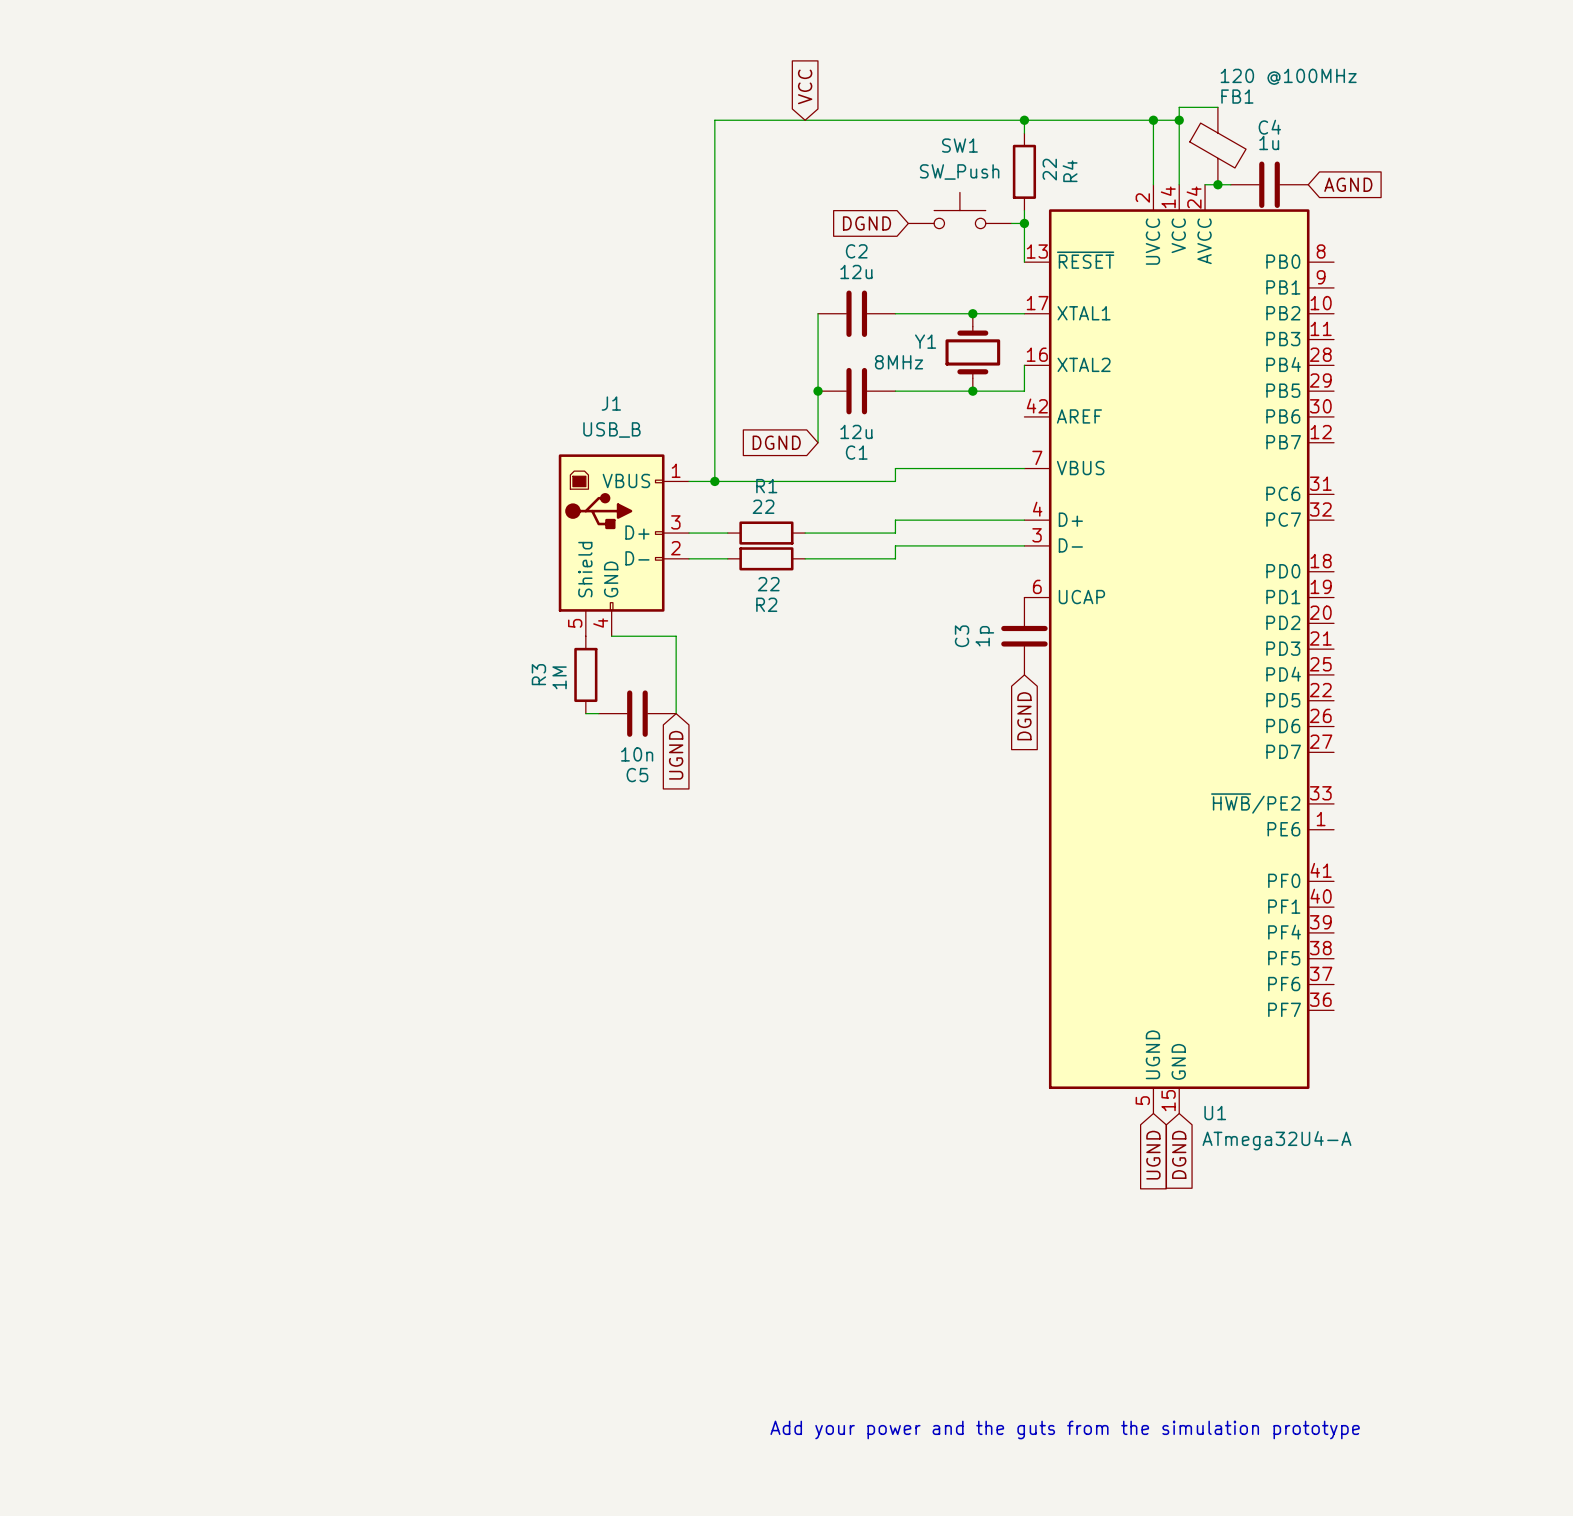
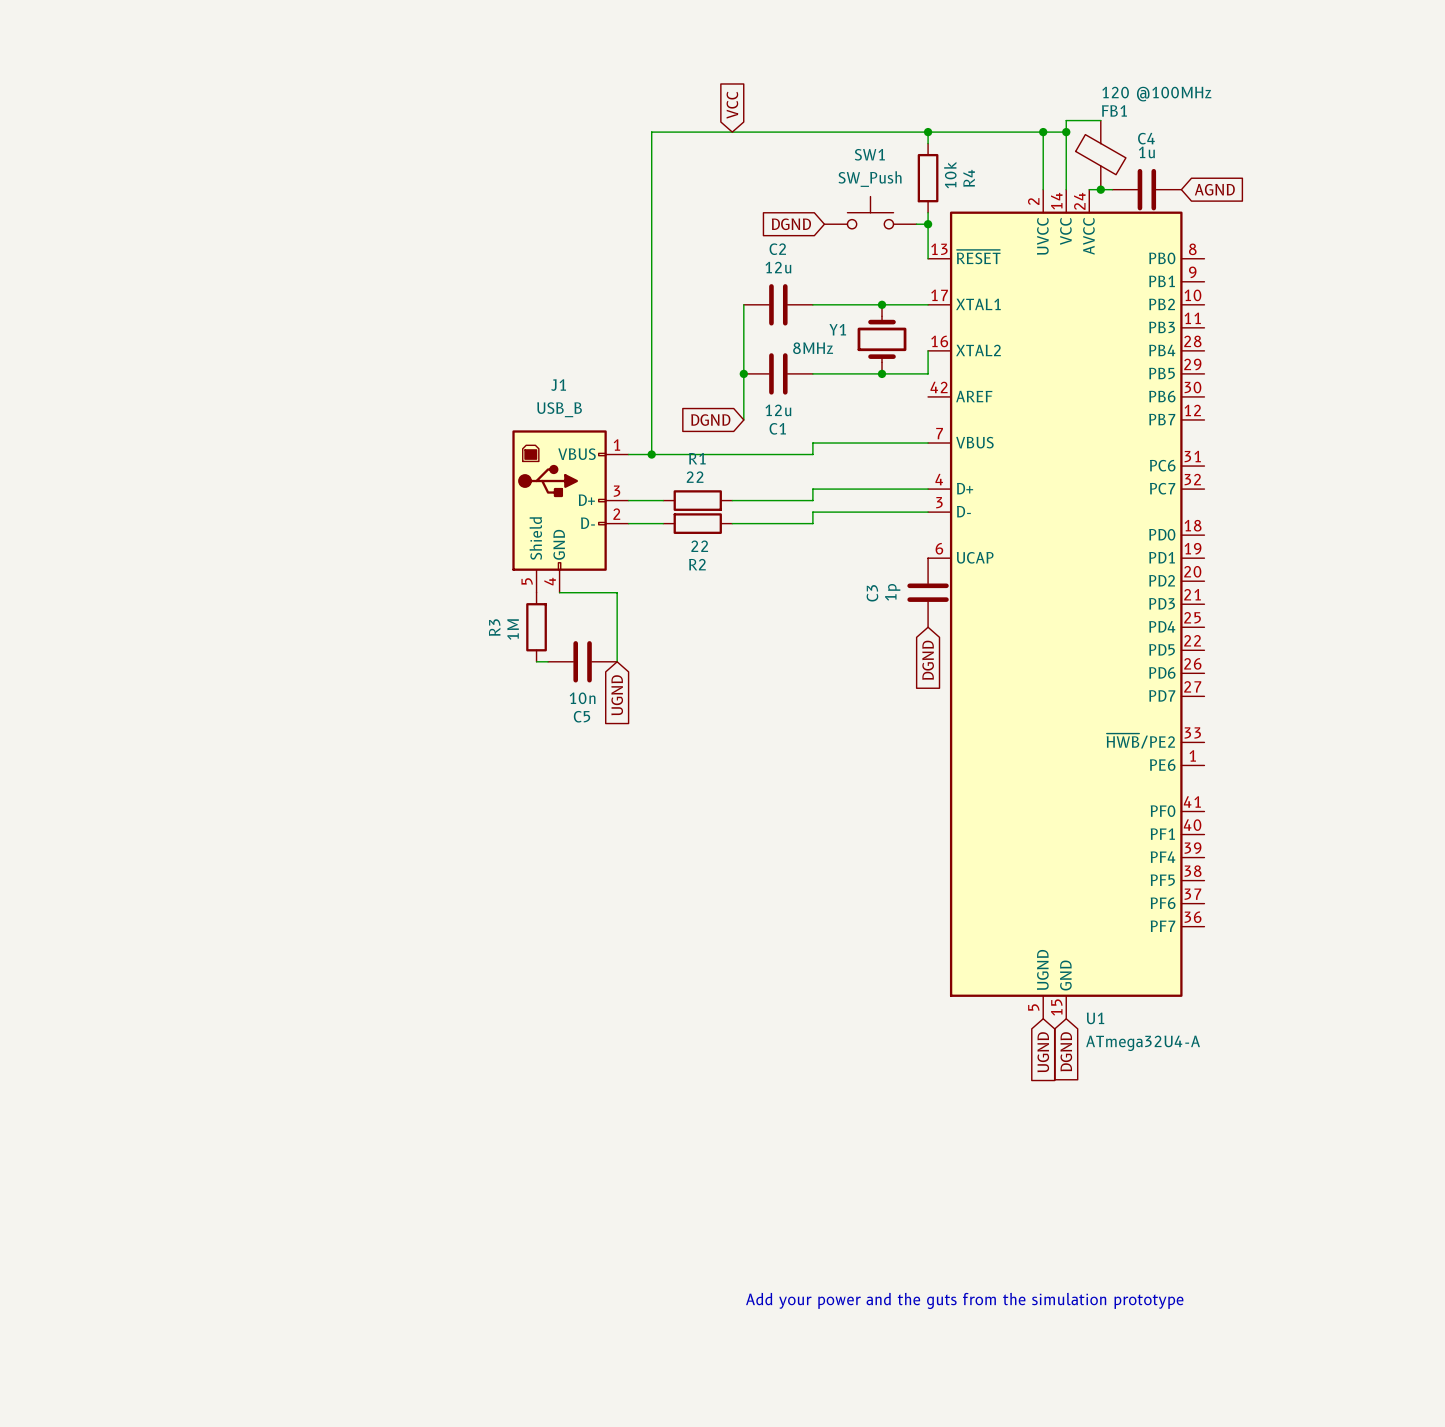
R4 value: 22 (1049, 169) -> 10k (950, 175)

